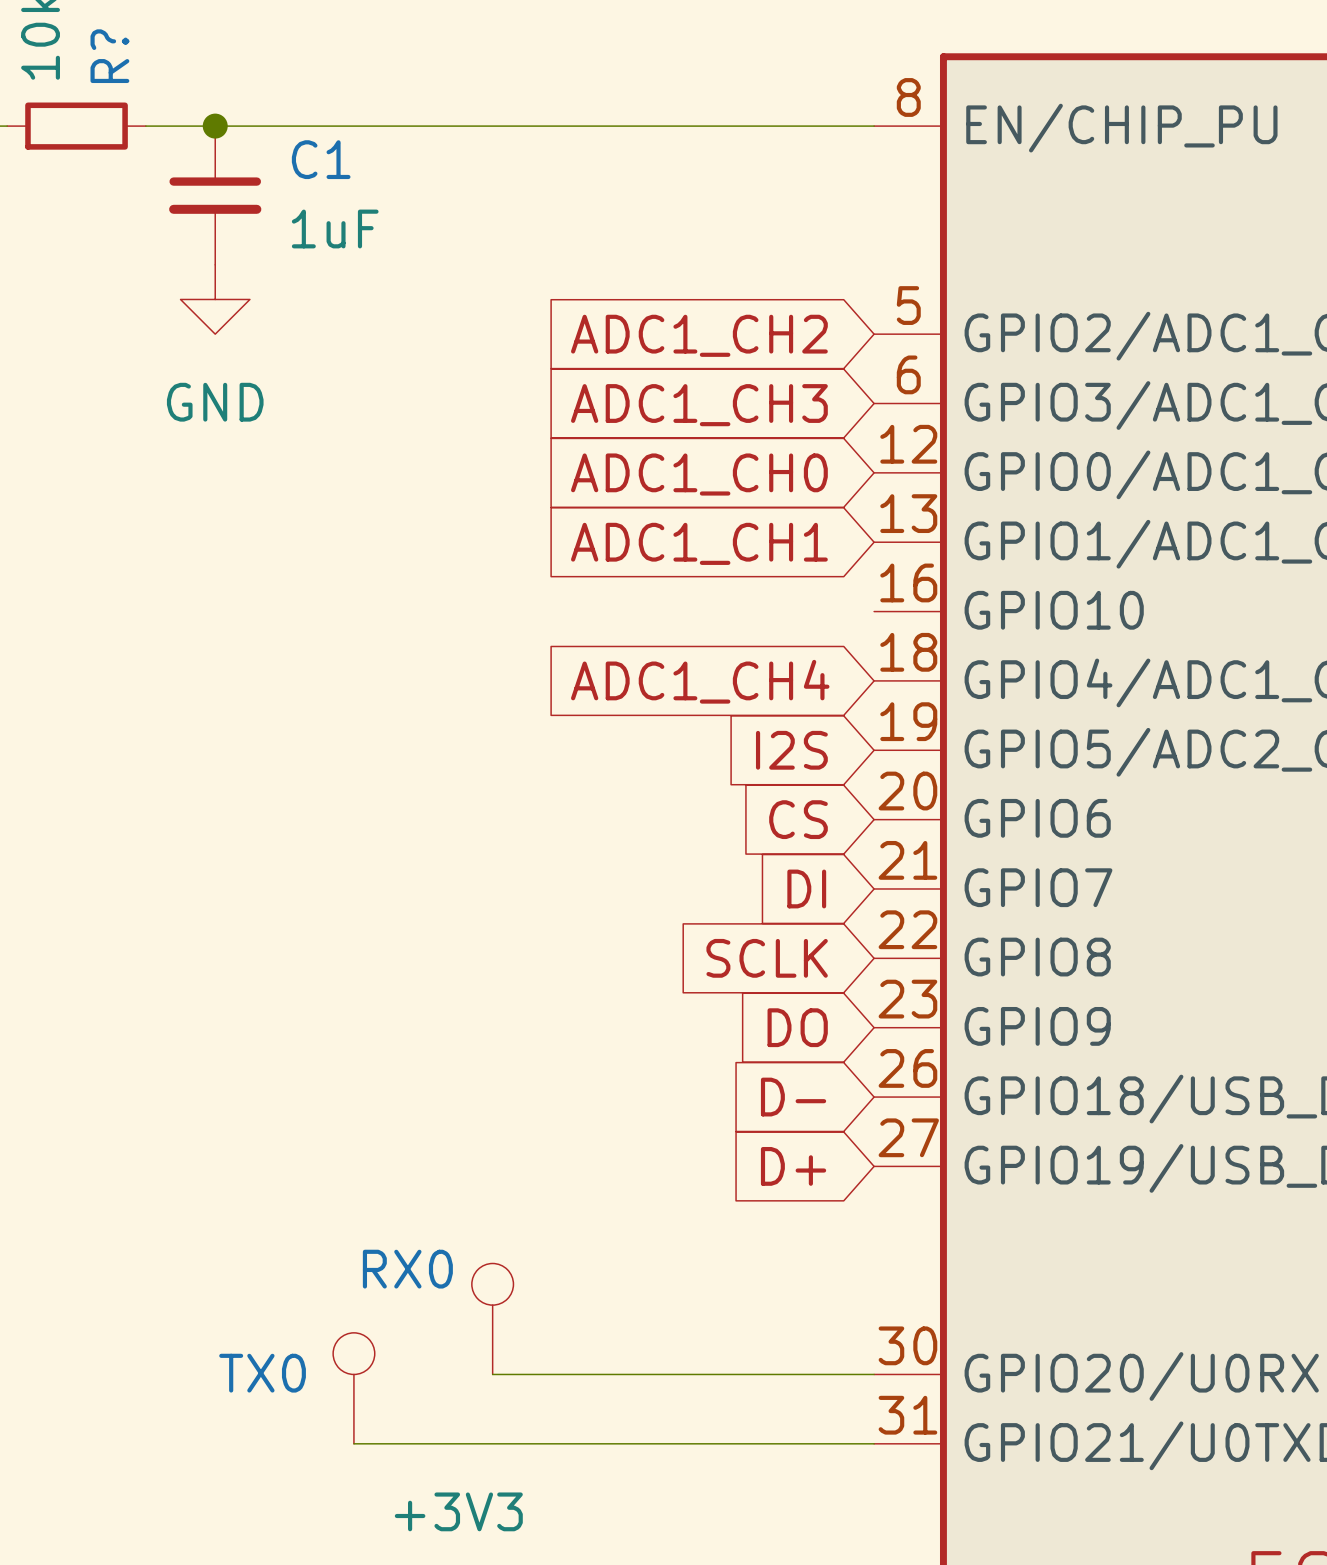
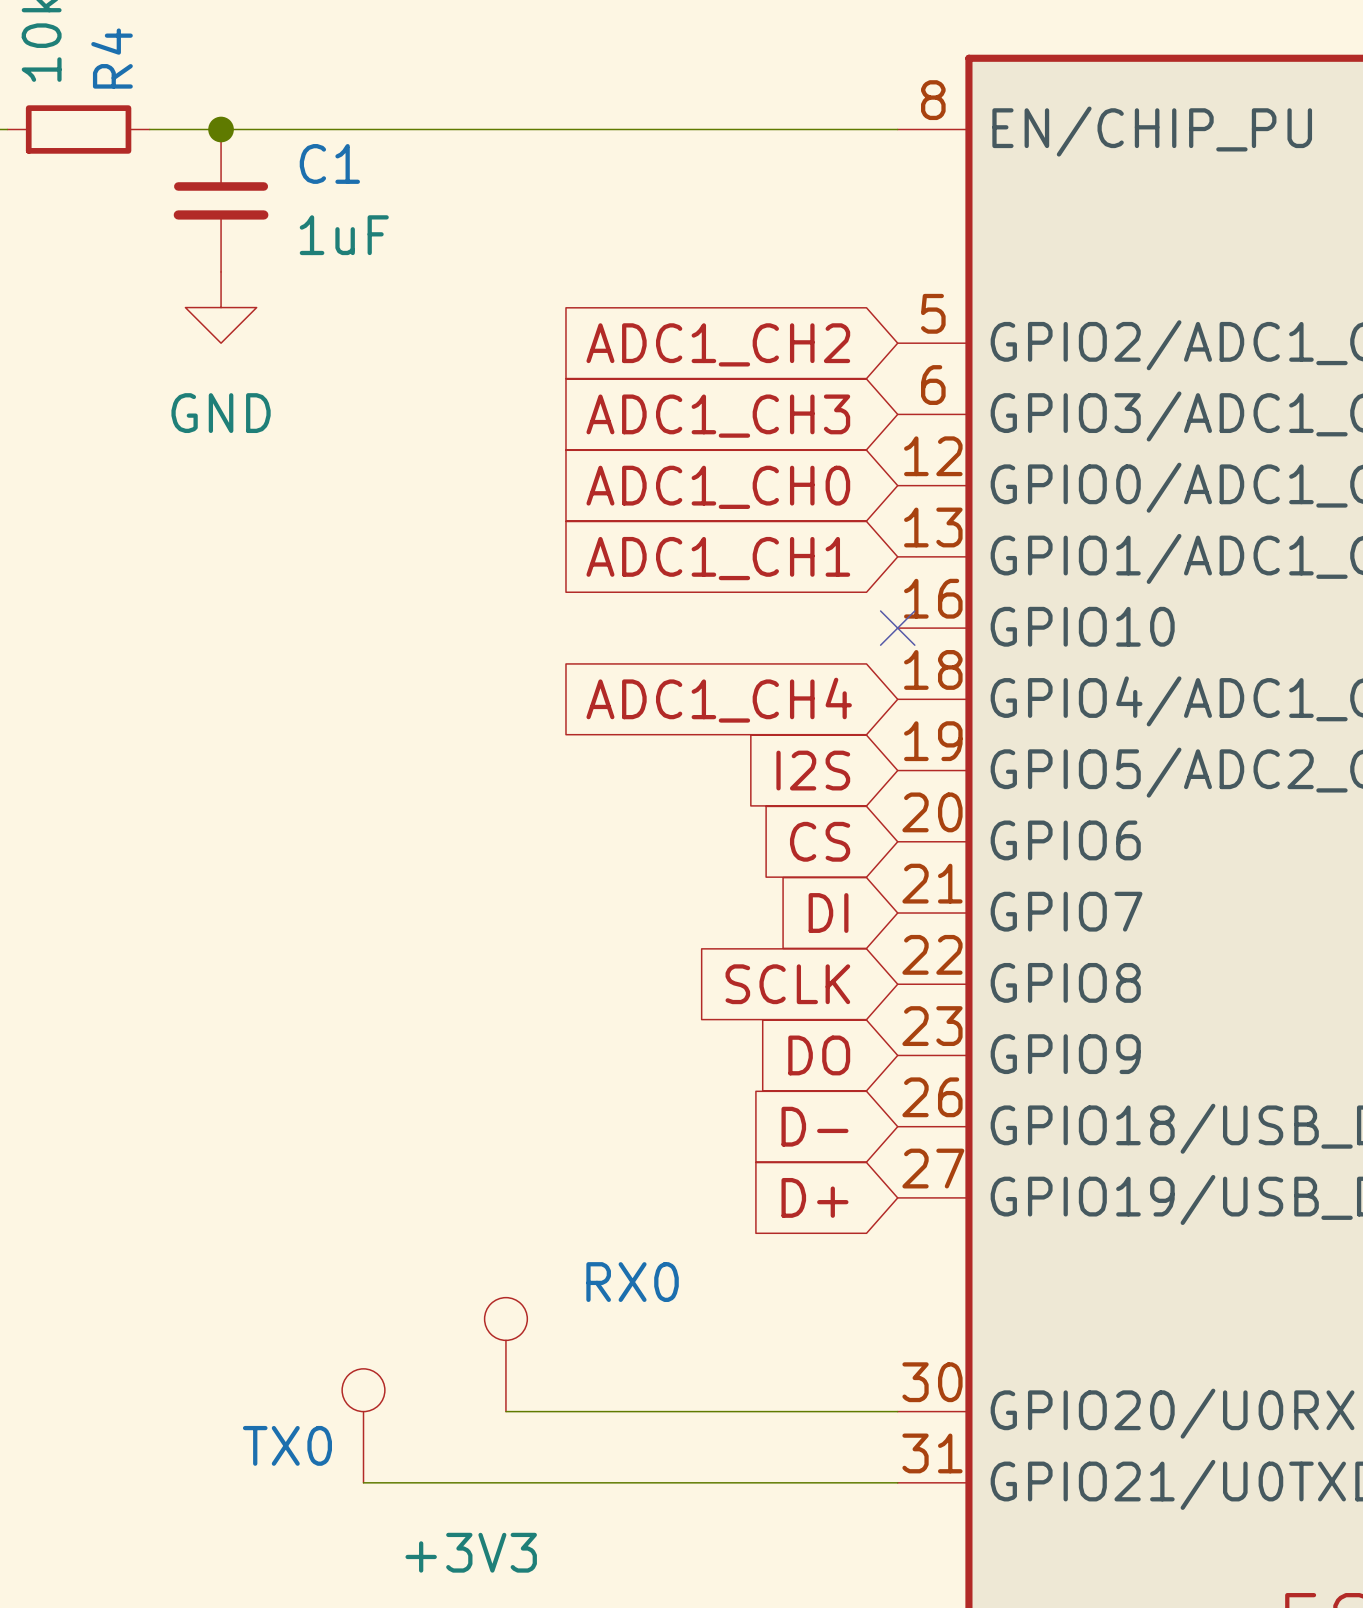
R? name: R? (109, 56) -> R4 (112, 58)
no-connect mark: none -> (897, 628)
RX0 name position: RX0 (407, 1269) -> RX0 (632, 1282)
TX0 name position: TX0 (262, 1373) -> TX0 (287, 1445)

